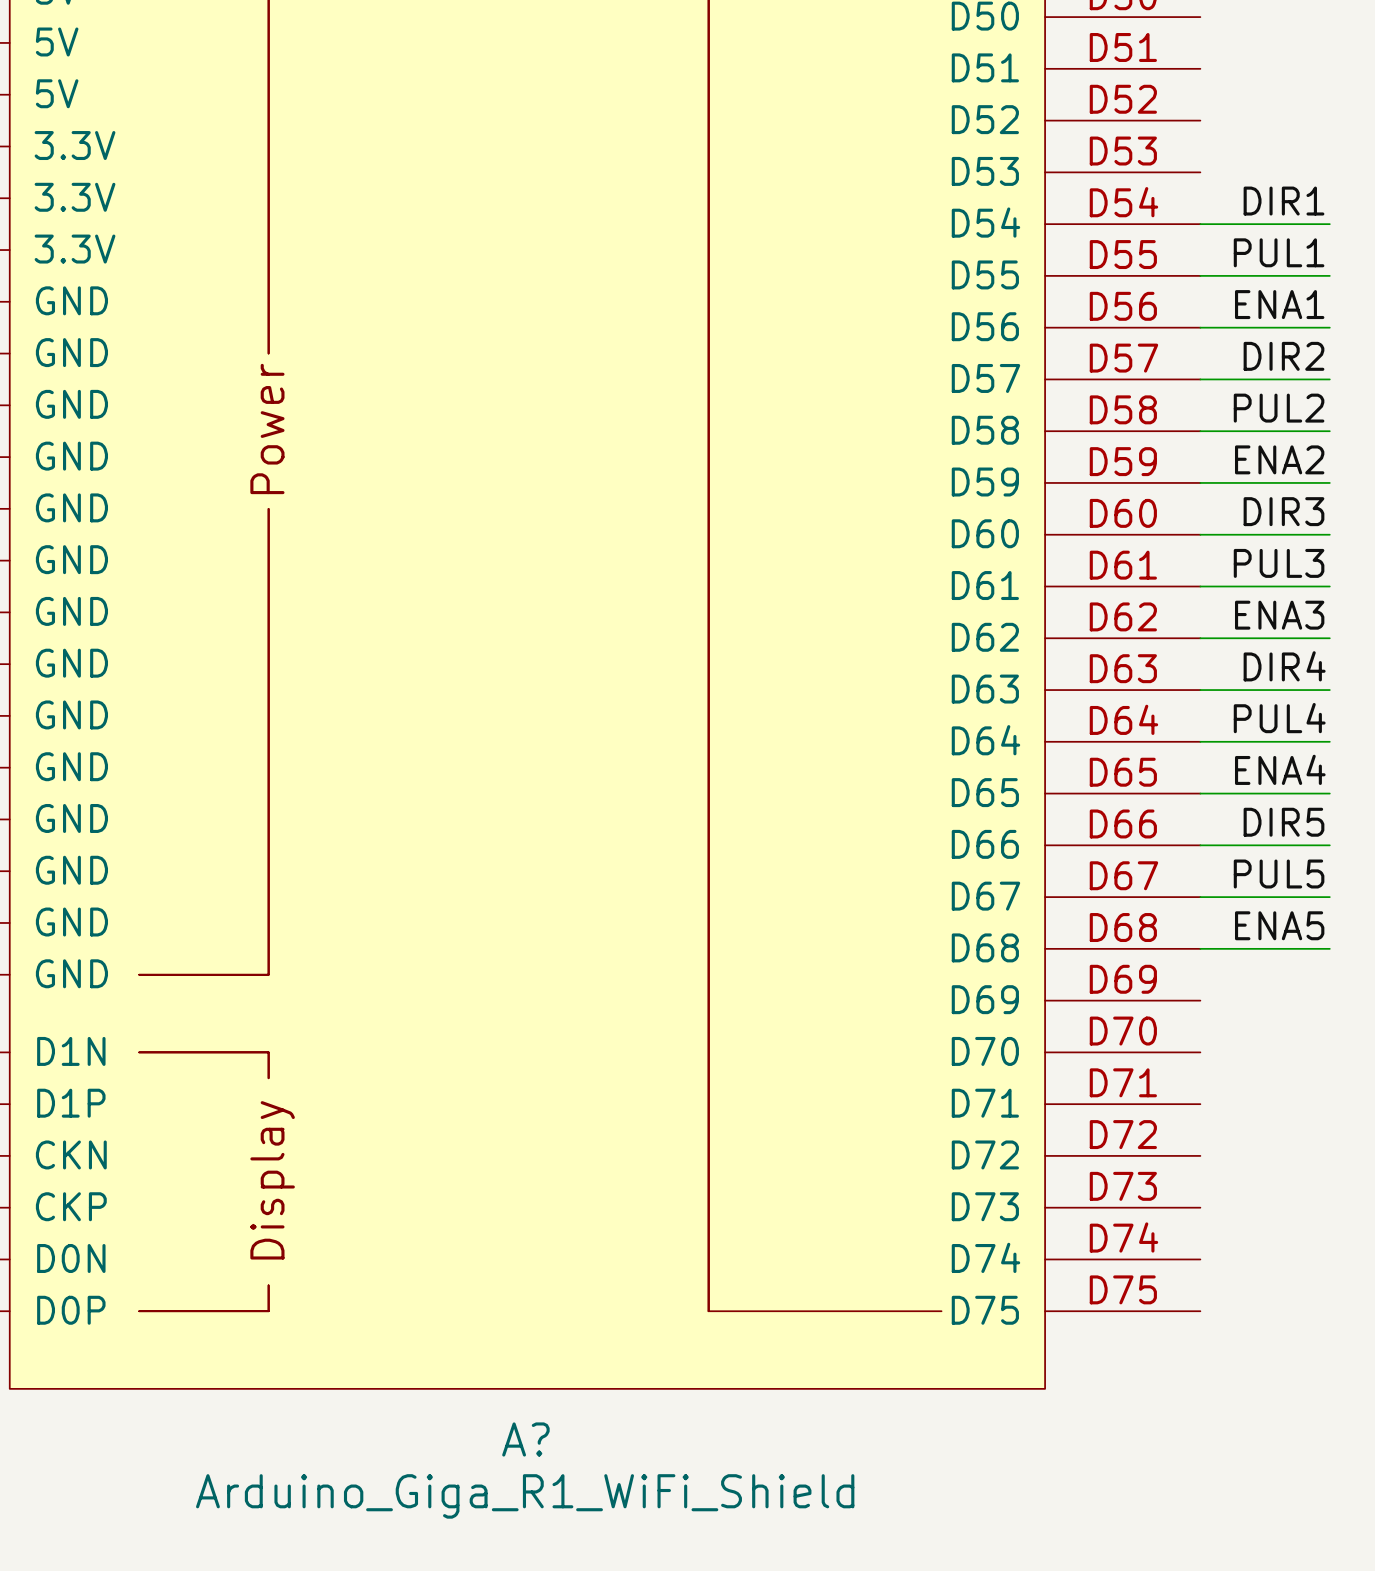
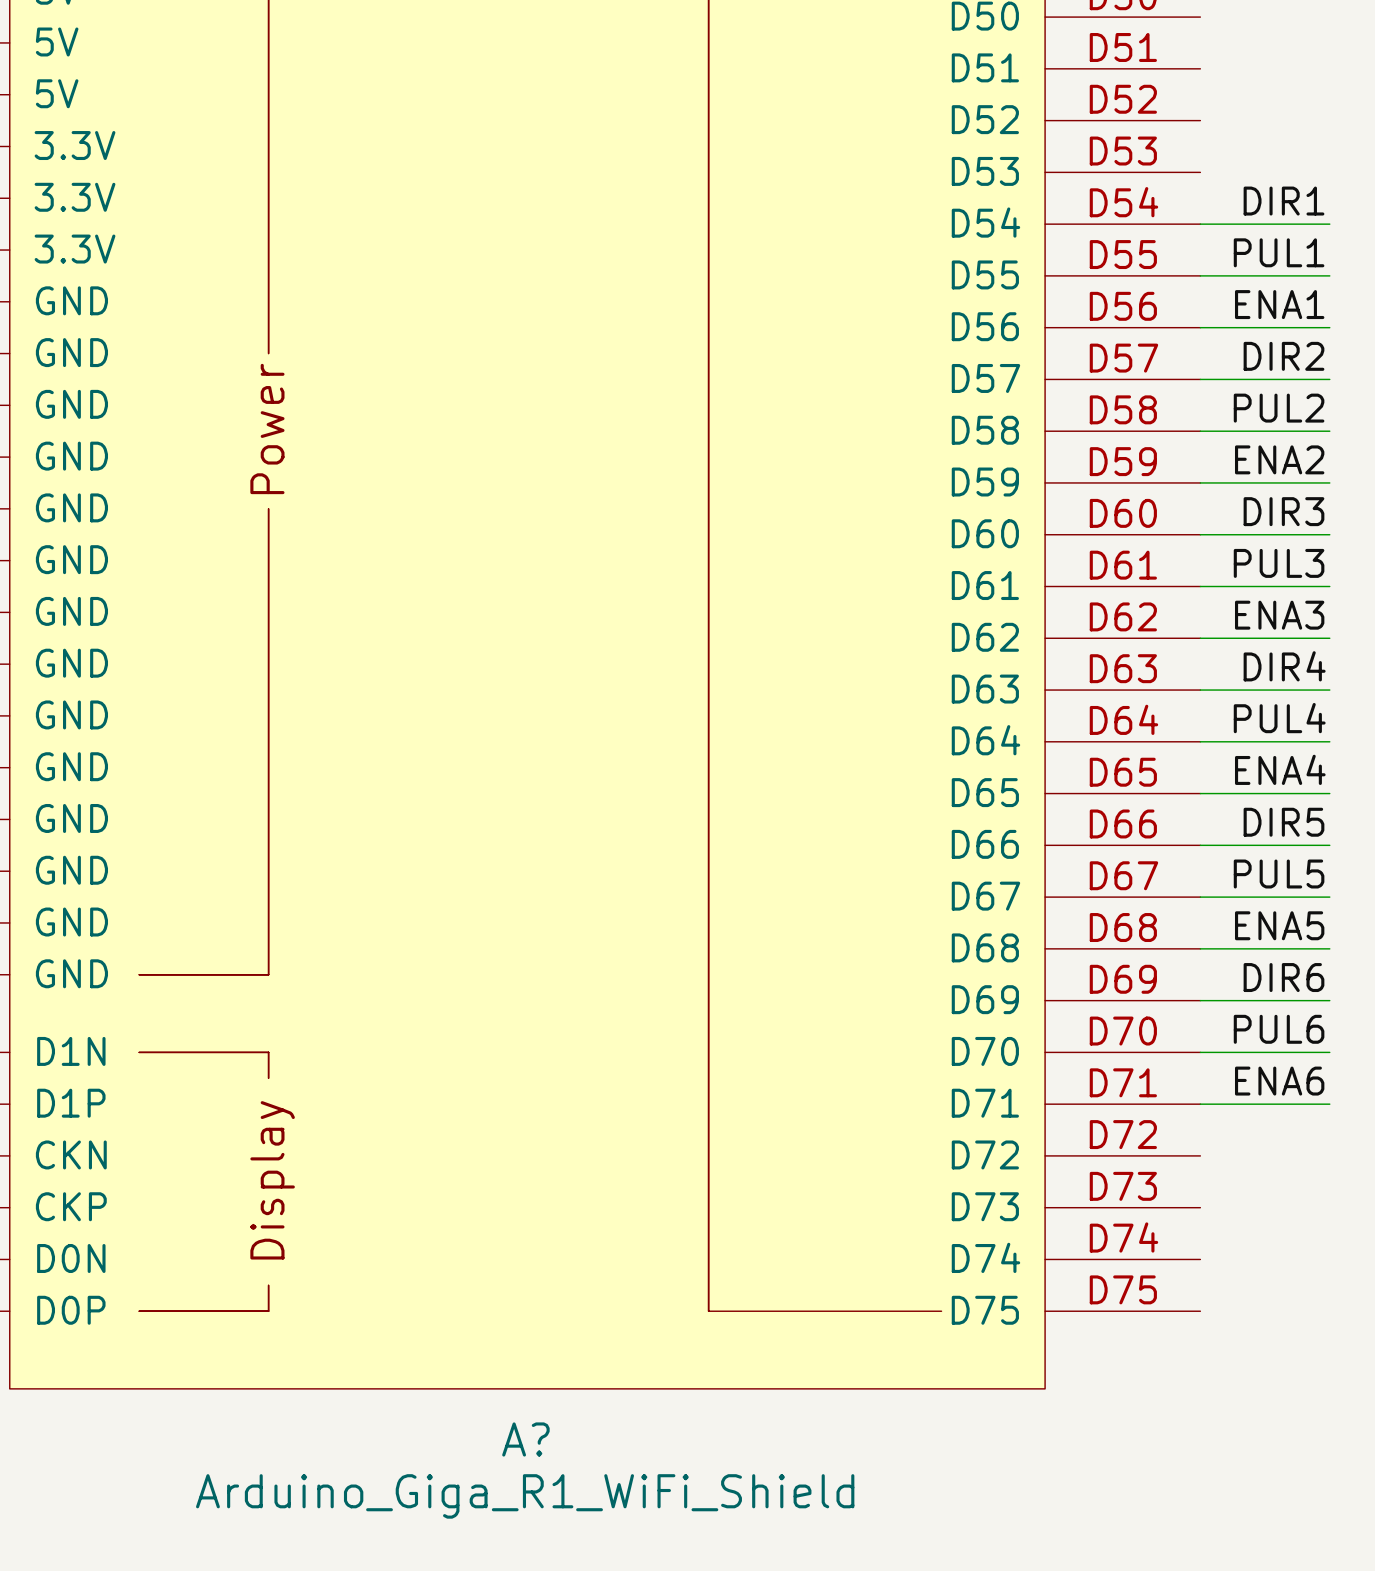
label: none -> DIR6 (1283, 977)
wire: none -> (1200, 1000) (1329, 1000)
label: none -> PUL6 (1279, 1029)
wire: none -> (1200, 1052) (1329, 1052)
label: none -> ENA6 (1279, 1081)
wire: none -> (1200, 1104) (1329, 1104)

